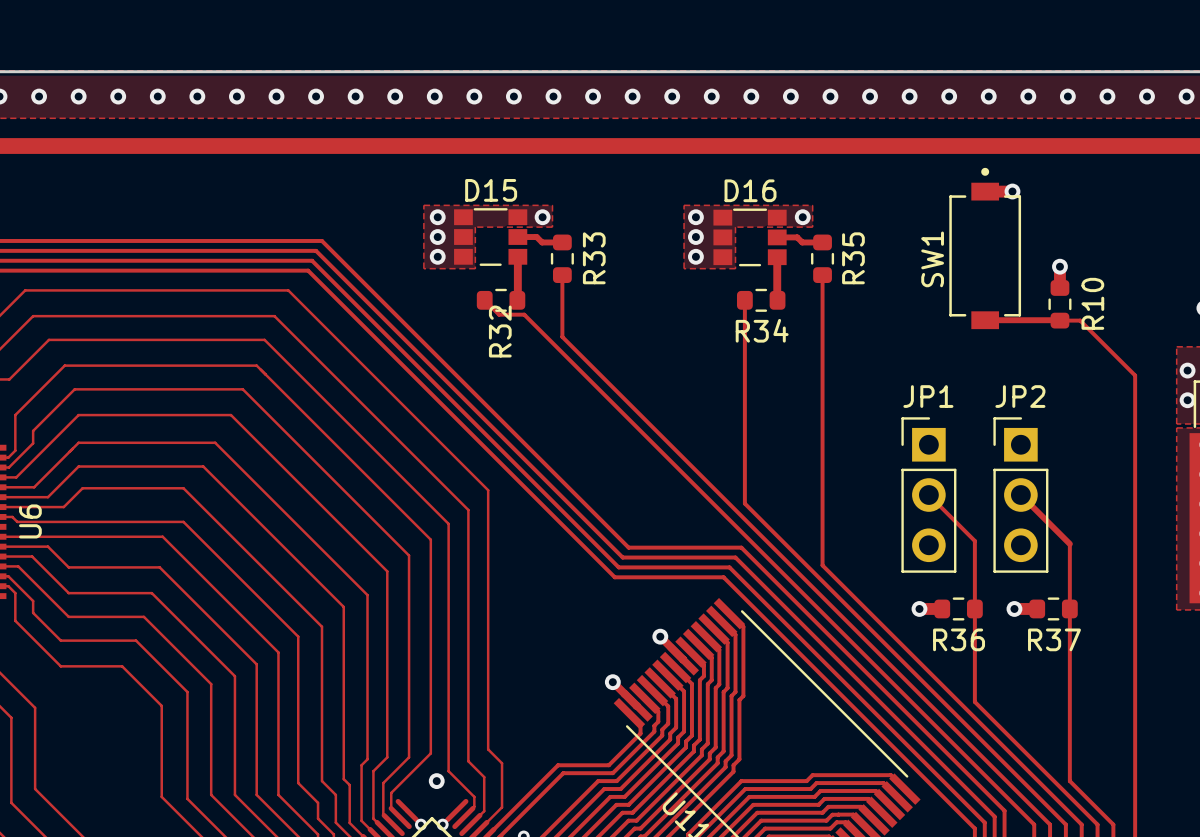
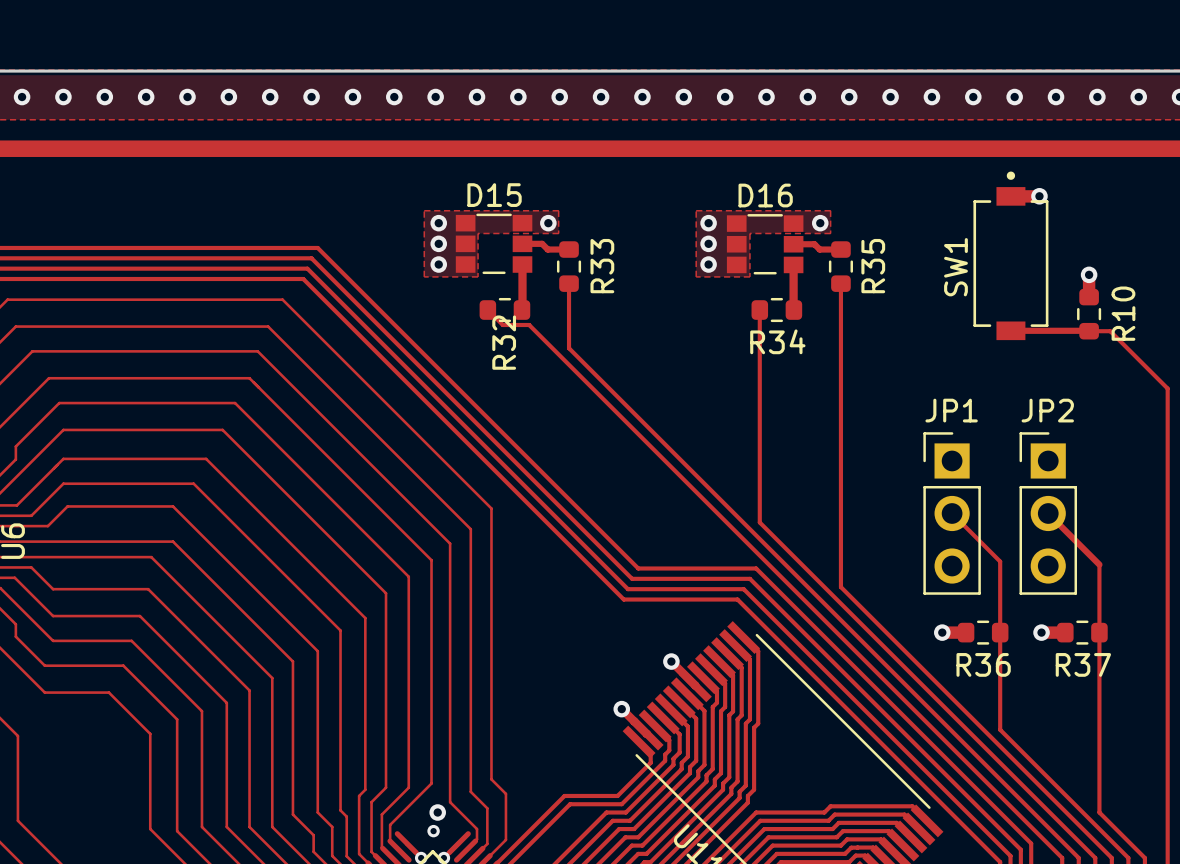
via: none -> (433, 831)

